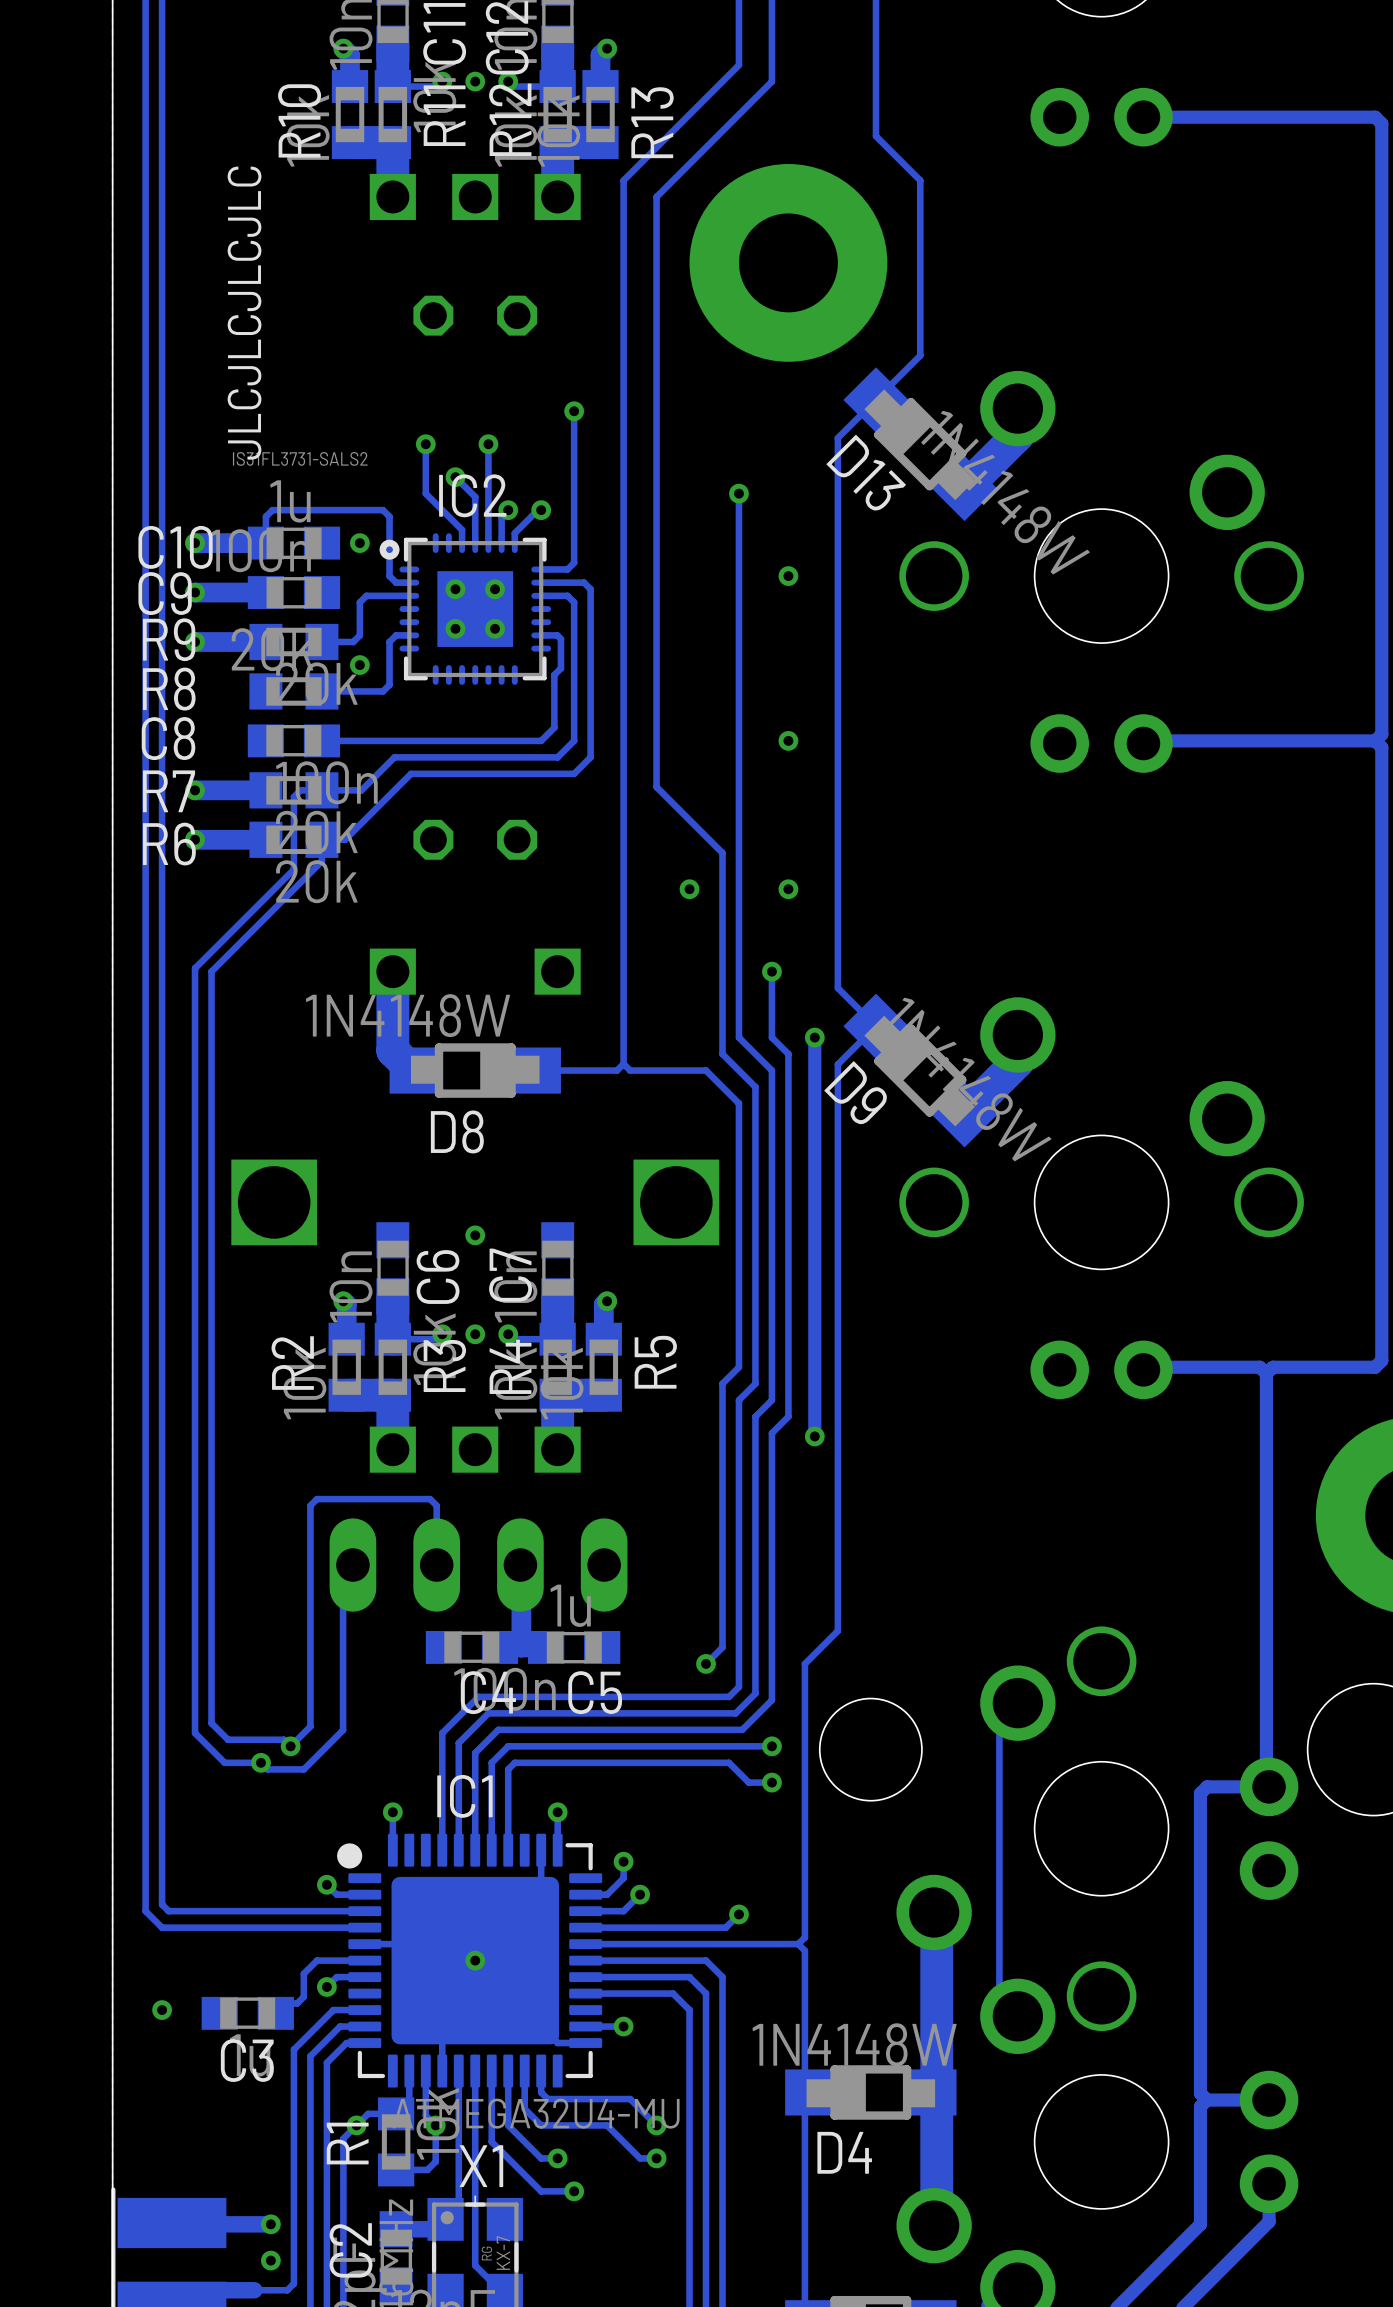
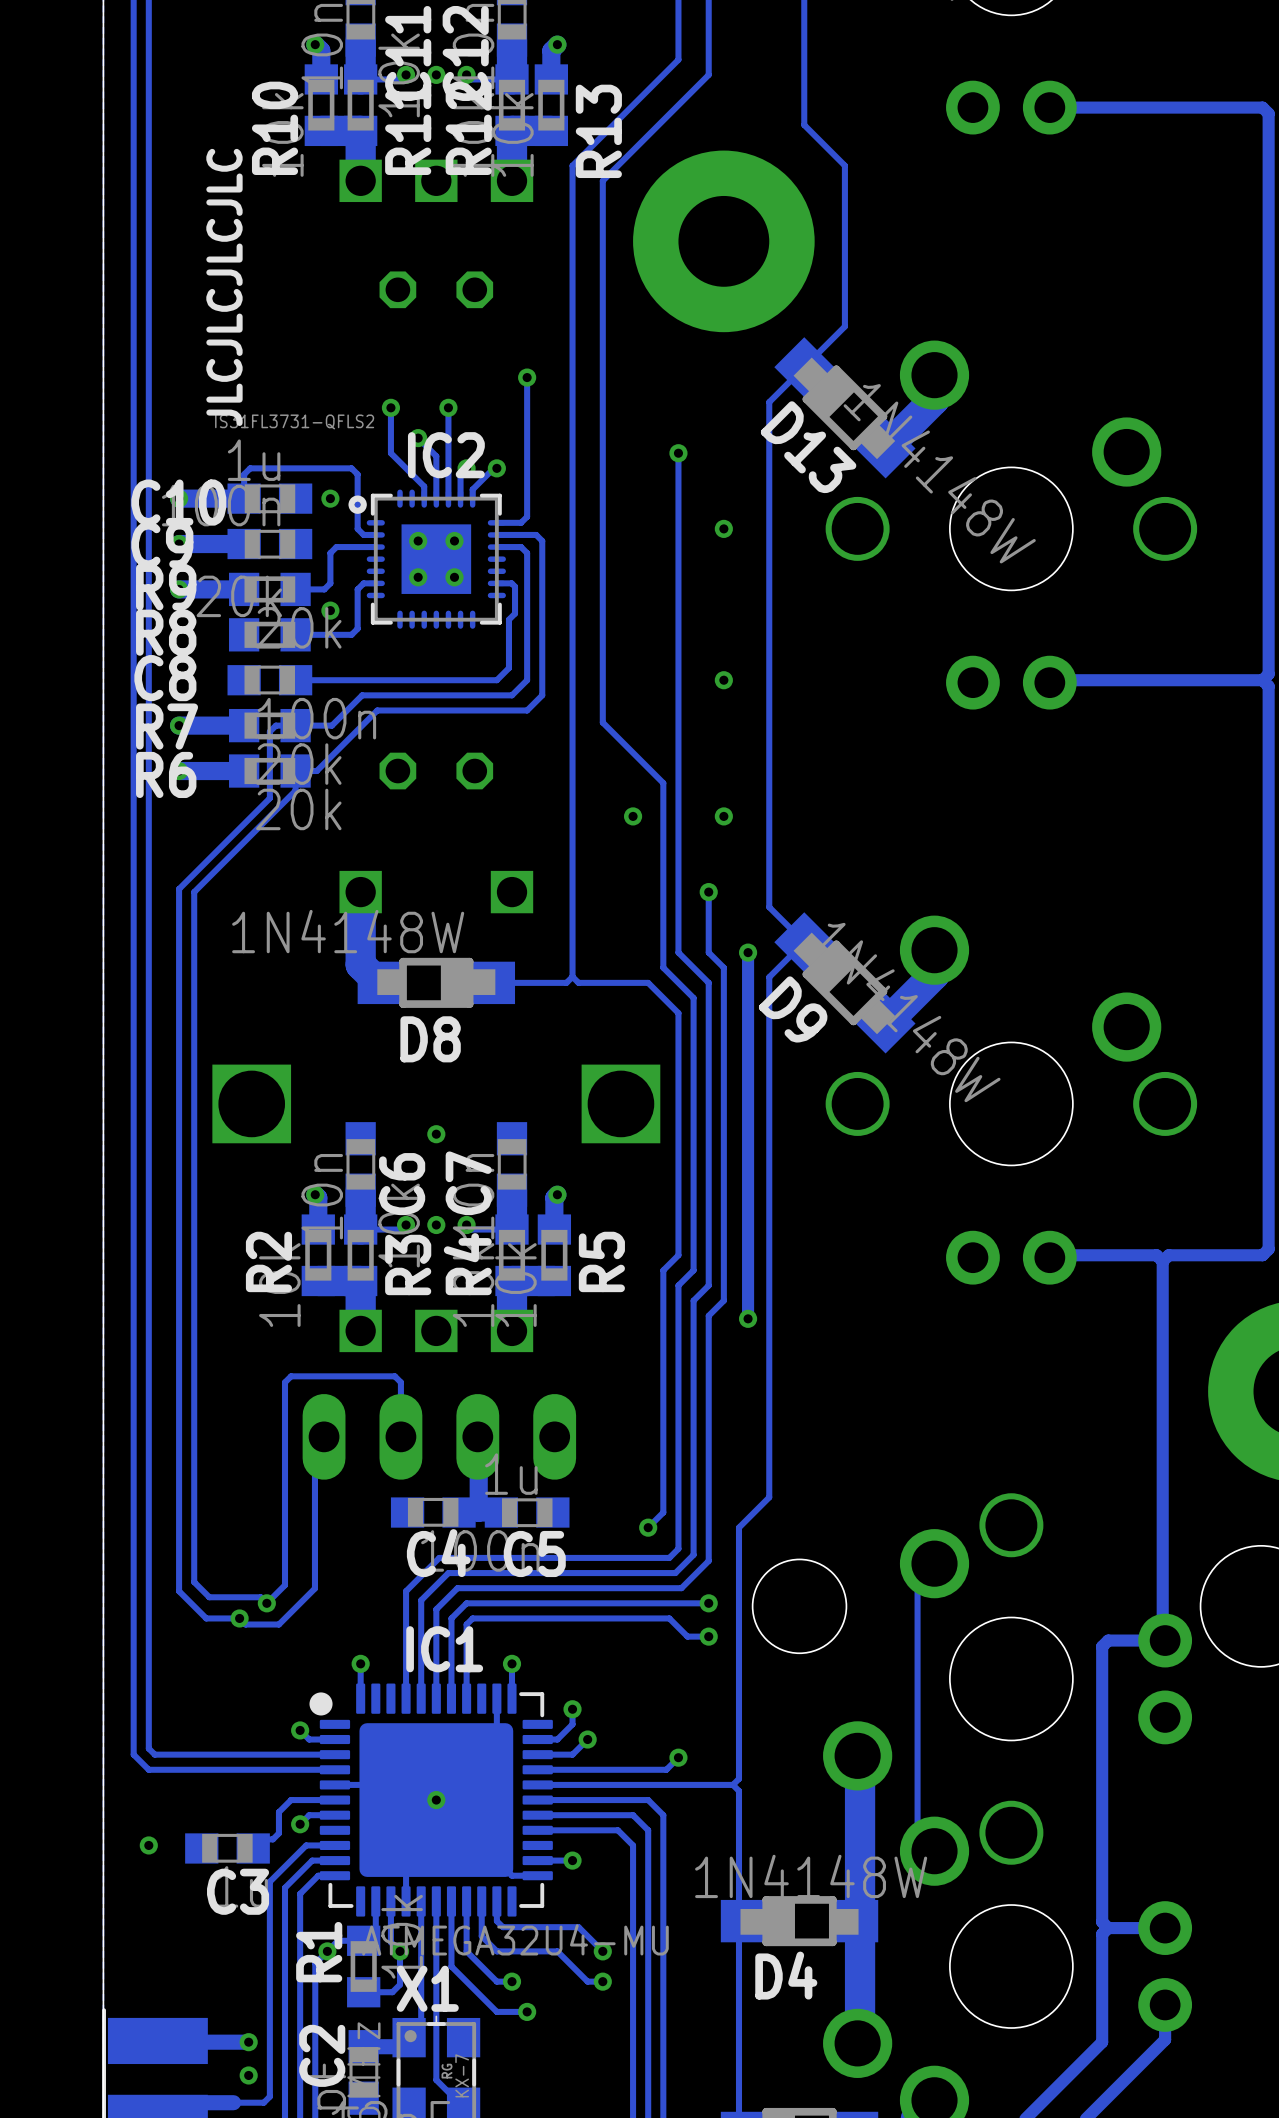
IC2 value: IS31FL3731-SALS2 (300, 458) -> IS31FL3731-QFLS2 (294, 421)

